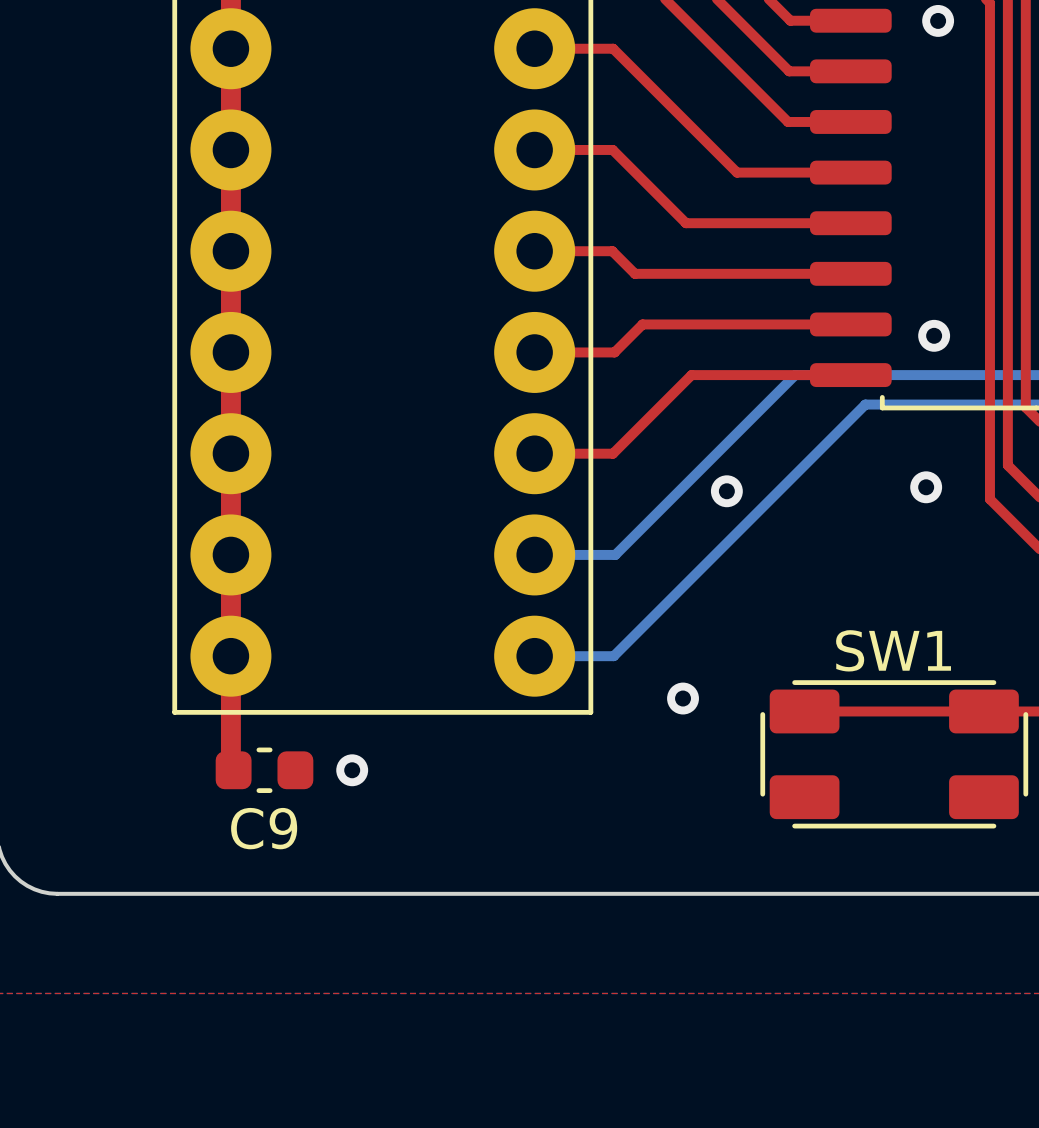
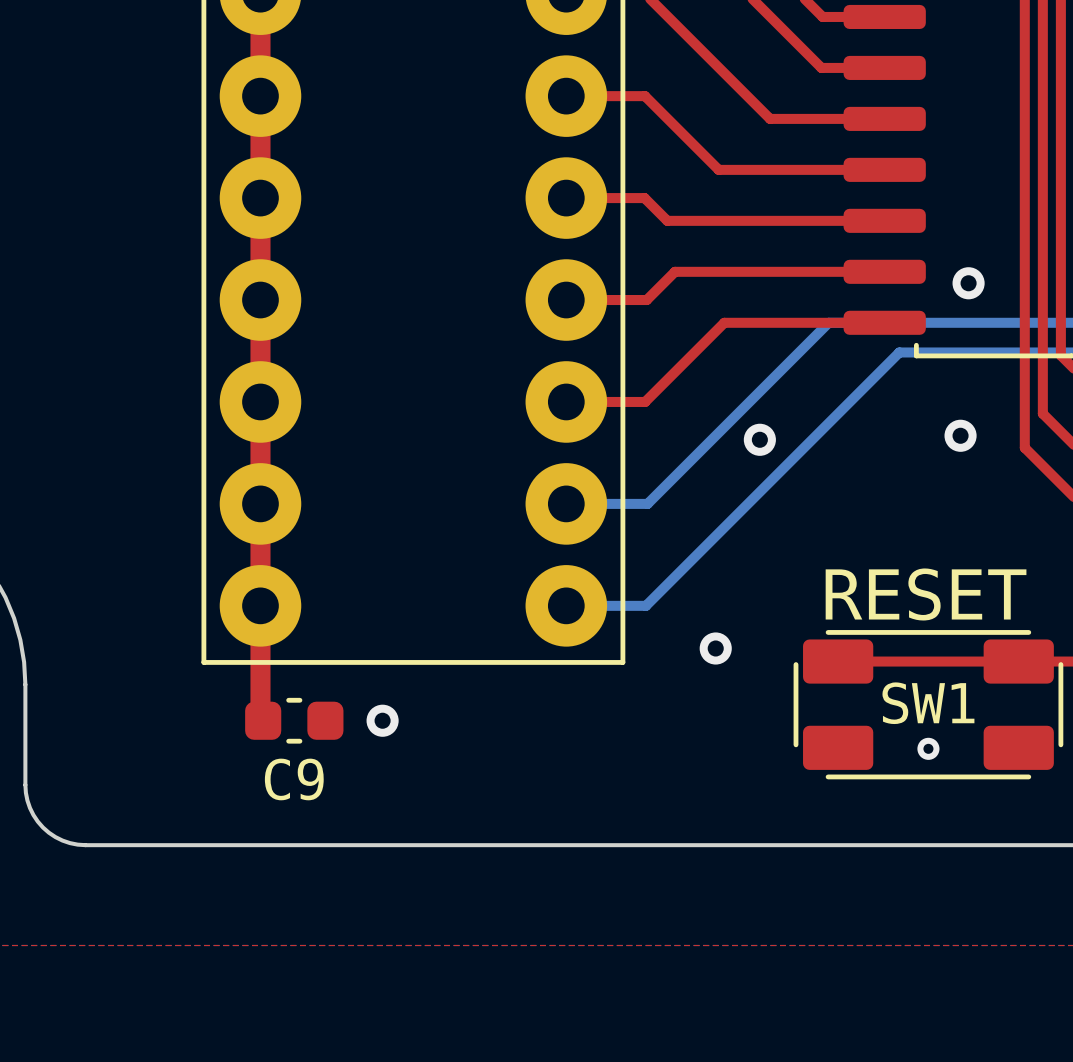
text: none -> RESET (926, 594)
SW1 name position: SW1 (893, 650) -> SW1 (928, 703)
via: none -> (928, 748)

